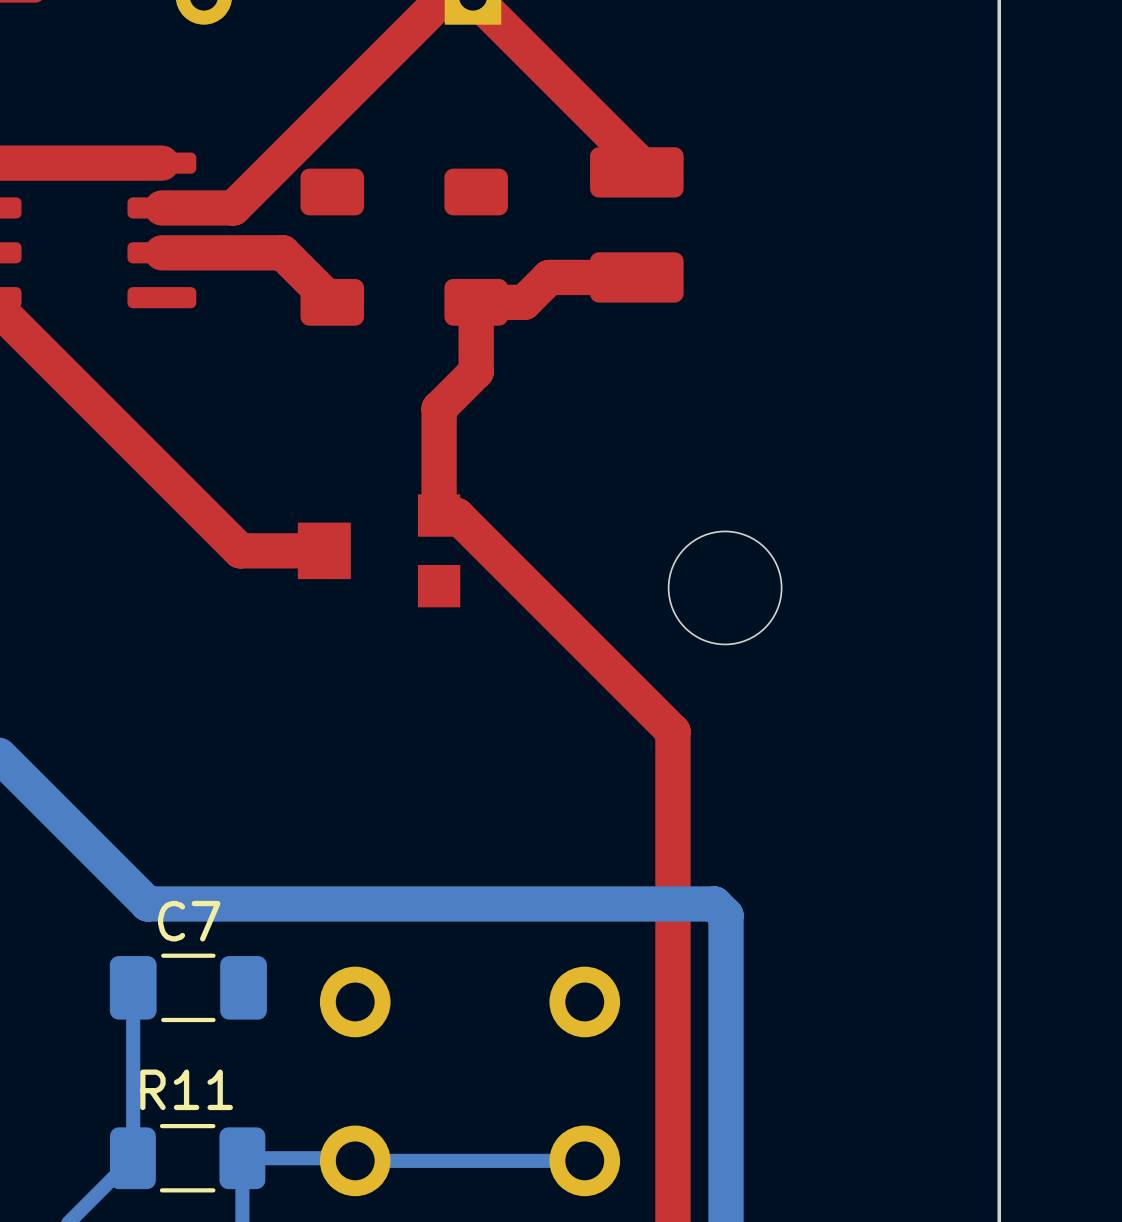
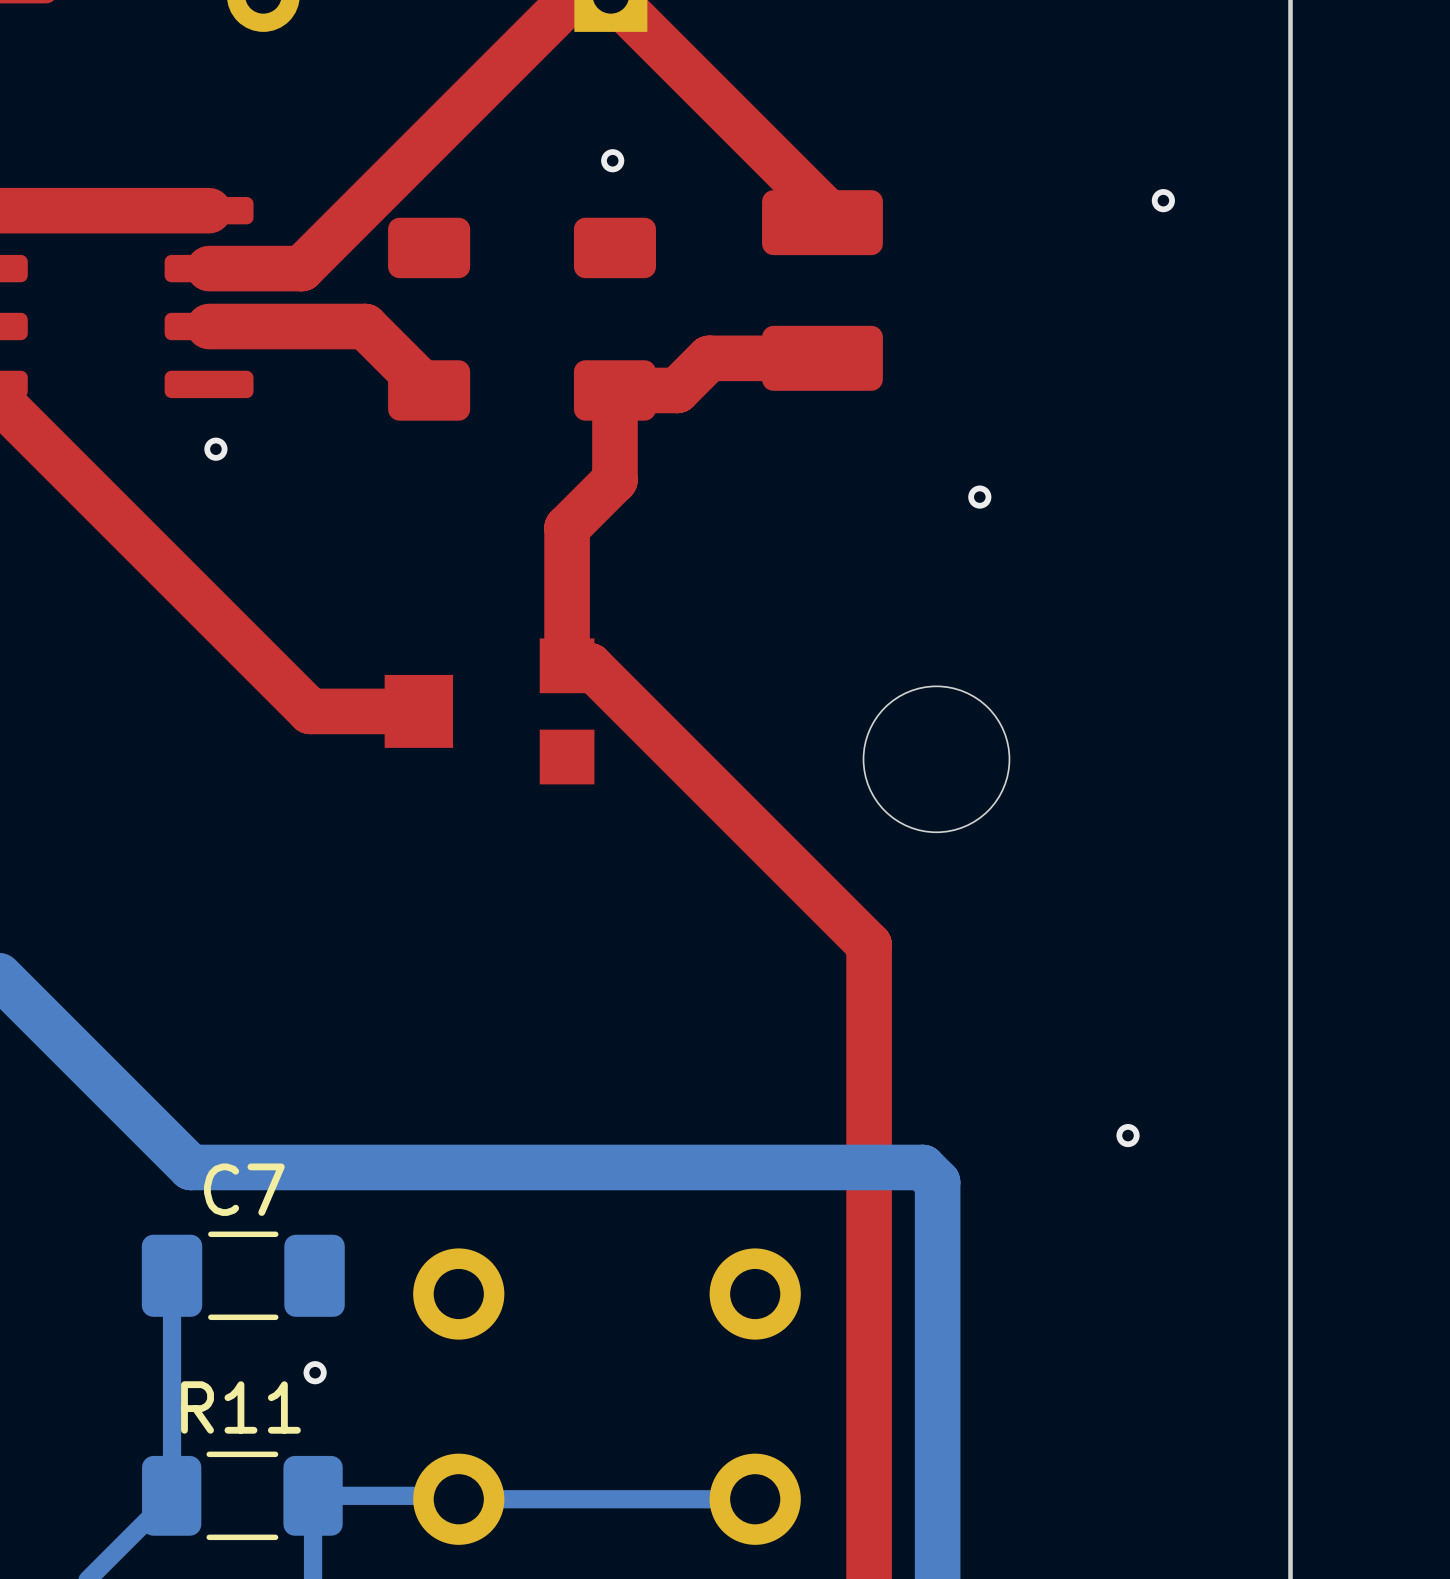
via: none -> (612, 160)
via: none -> (1163, 200)
via: none -> (215, 449)
via: none -> (979, 497)
via: none -> (1128, 1135)
via: none -> (315, 1372)

